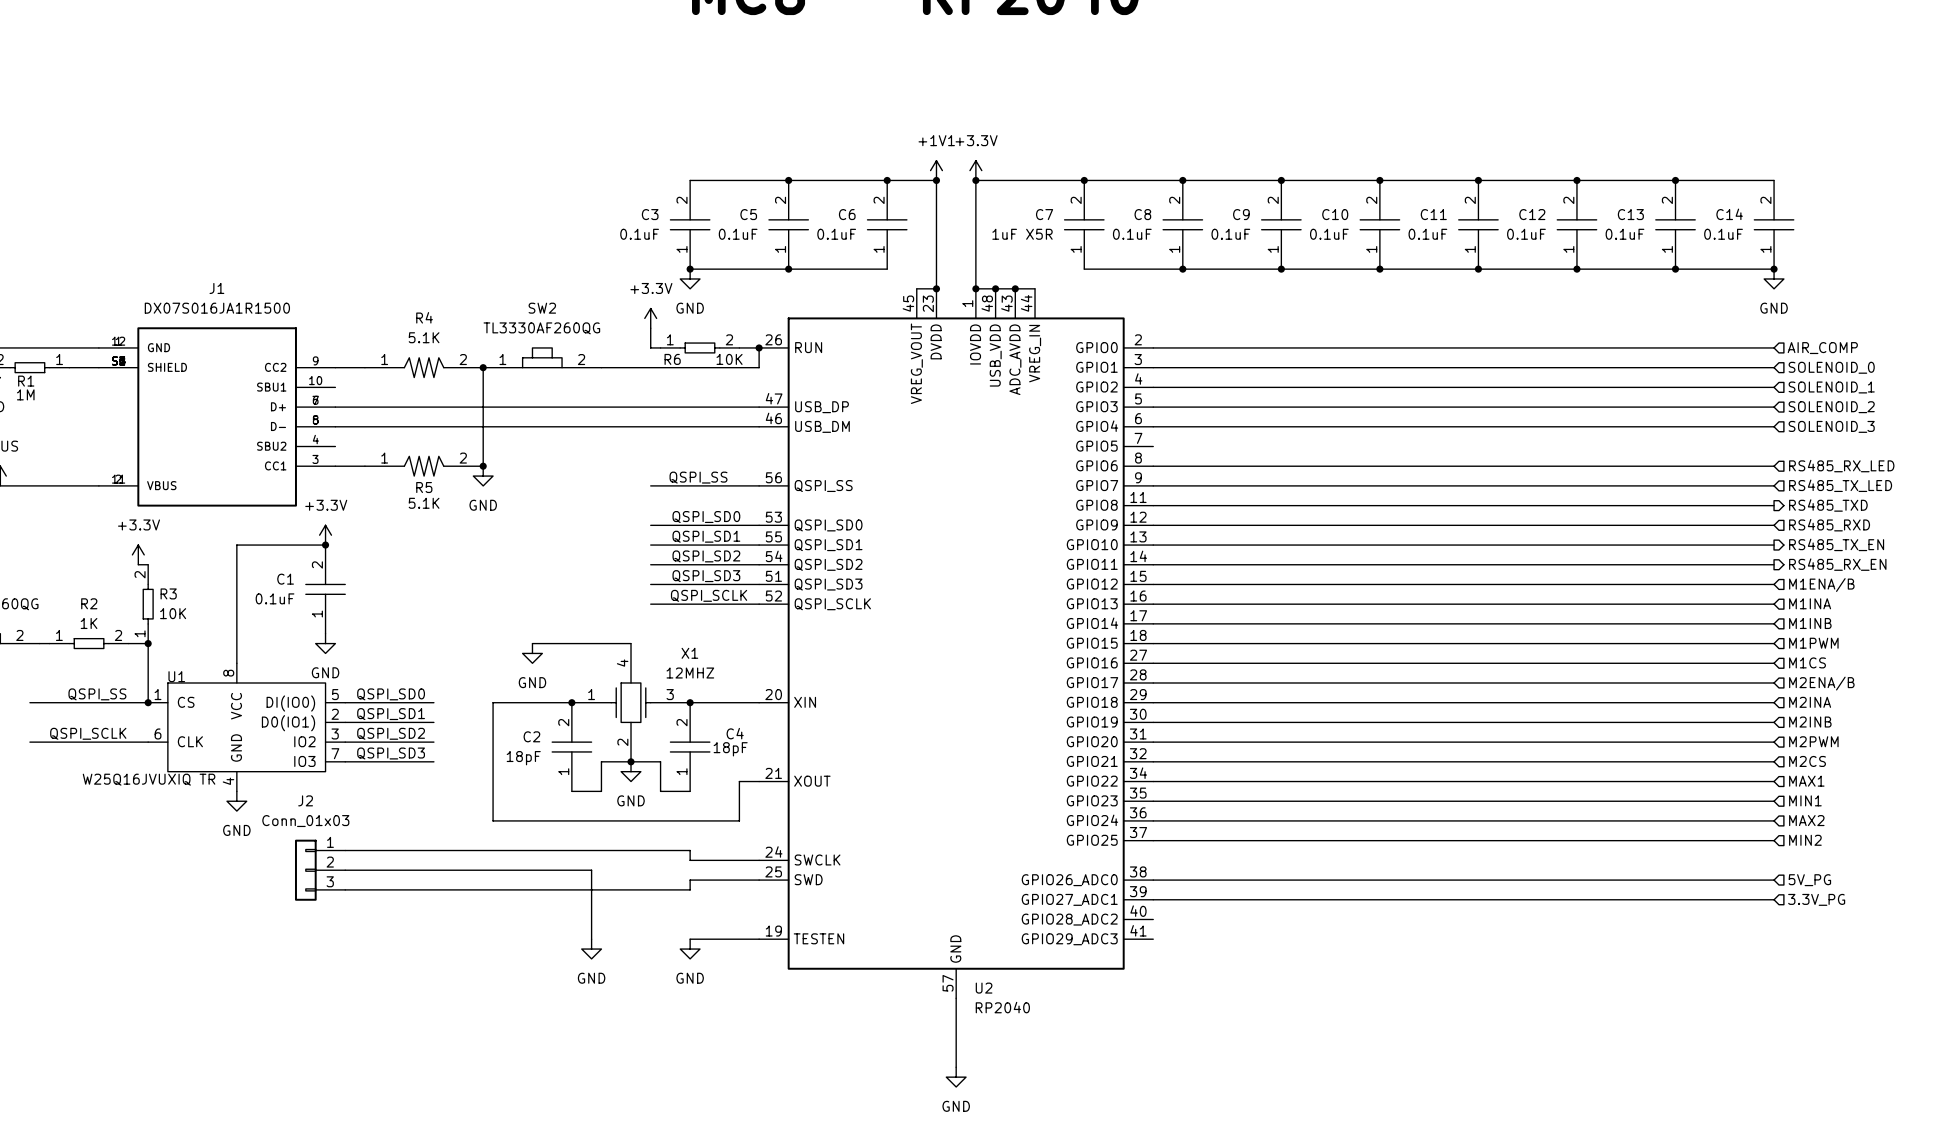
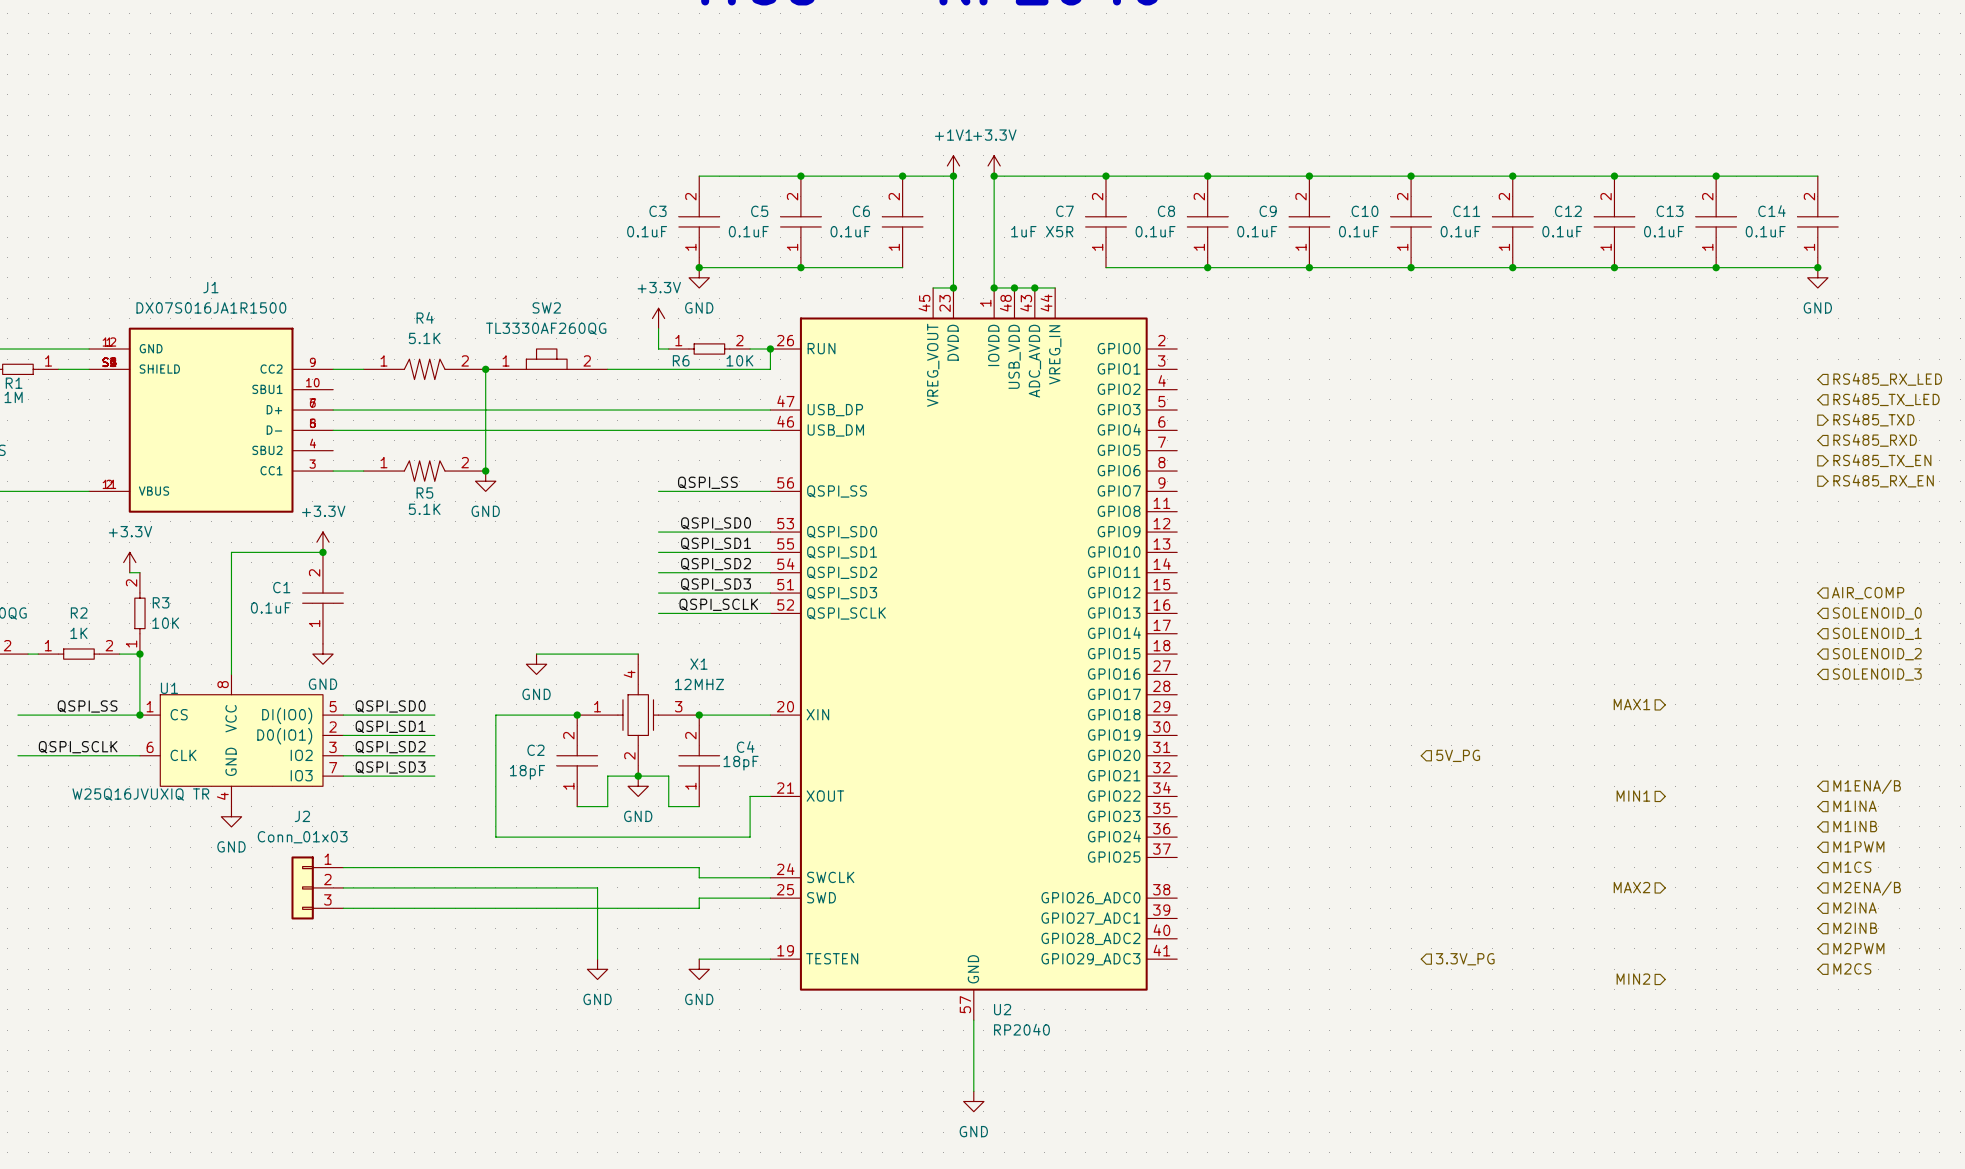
wire: (1153, 347) (1774, 347) -> none
hierarchical label: AIR_COMP (1822, 348) -> none
wire: (1153, 367) (1774, 367) -> none
hierarchical label: SOLENOID_0 (1831, 367) -> none
wire: (1153, 387) (1774, 387) -> none
hierarchical label: SOLENOID_1 (1831, 387) -> none
wire: (1153, 407) (1774, 407) -> none
hierarchical label: SOLENOID_2 (1831, 407) -> none
wire: (1153, 426) (1774, 426) -> none
hierarchical label: SOLENOID_3 (1831, 426) -> none
wire: (1153, 466) (1774, 466) -> none
hierarchical label position: RS485_RX_LED (1841, 466) -> RS485_RX_LED (1887, 379)
wire: (1153, 485) (1774, 485) -> none
hierarchical label position: RS485_TX_LED (1840, 485) -> RS485_TX_LED (1886, 399)
wire: (1153, 505) (1774, 505) -> none
hierarchical label position: RS485_TXD (1828, 505) -> RS485_TXD (1873, 420)
wire: (1153, 525) (1774, 525) -> none
hierarchical label position: RS485_RXD (1829, 525) -> RS485_RXD (1875, 440)
hierarchical label position: RS485_TX_EN (1836, 544) -> RS485_TX_EN (1882, 460)
wire: (1153, 545) (1774, 545) -> none
wire: (1153, 564) (1774, 564) -> none
hierarchical label position: RS485_RX_EN (1837, 564) -> RS485_RX_EN (1883, 481)
wire: (1153, 584) (1774, 584) -> none
hierarchical label: M1ENA/B (1821, 585) -> AIR_COMP (1868, 593)
hierarchical label: M1INA (1810, 603) -> SOLENOID_0 (1877, 613)
wire: (1153, 604) (1774, 604) -> none
wire: (1153, 623) (1774, 623) -> none
hierarchical label: M1INB (1810, 623) -> SOLENOID_1 (1877, 633)
wire: (1153, 643) (1774, 643) -> none
hierarchical label: M1PWM (1813, 643) -> SOLENOID_2 (1877, 654)
hierarchical label: M1CS (1807, 662) -> SOLENOID_3 (1877, 674)
wire: (1153, 663) (1774, 663) -> none
wire: (1153, 682) (1774, 682) -> none
hierarchical label position: M2ENA/B (1821, 683) -> M2ENA/B (1867, 888)
hierarchical label: none -> MAX1 (1631, 704)
wire: (1153, 702) (1774, 702) -> none
hierarchical label position: M2INA (1810, 702) -> M2INA (1855, 907)
wire: (1153, 722) (1774, 722) -> none
hierarchical label position: M2INB (1810, 722) -> M2INB (1855, 928)
hierarchical label position: M2PWM (1813, 741) -> M2PWM (1858, 948)
wire: (1153, 742) (1774, 742) -> none
hierarchical label: none -> 5V_PG (1458, 755)
wire: (1153, 761) (1774, 761) -> none
hierarchical label position: M2CS (1807, 761) -> M2CS (1852, 968)
hierarchical label: none -> M1ENA/B (1867, 786)
wire: (1153, 781) (1774, 781) -> none
hierarchical label: MAX1 (1806, 781) -> none
hierarchical label: none -> M1INA (1855, 806)
hierarchical label rotation: 0° (1805, 800) -> 180° (1633, 796)
hierarchical label position: MIN1 (1805, 800) -> MIN1 (1633, 796)
wire: (1153, 801) (1774, 801) -> none
hierarchical label: none -> M1INB (1855, 826)
wire: (1153, 820) (1774, 820) -> none
hierarchical label rotation: 0° (1806, 820) -> 180° (1631, 887)
hierarchical label position: MAX2 (1806, 820) -> MAX2 (1631, 887)
hierarchical label: none -> M1PWM (1858, 846)
wire: (1153, 840) (1774, 840) -> none
hierarchical label: MIN2 (1805, 840) -> none
hierarchical label: none -> M1CS (1852, 867)
wire: (1153, 880) (1774, 880) -> none
hierarchical label: 5V_PG (1809, 880) -> none
wire: (1153, 899) (1774, 899) -> none
hierarchical label: 3.3V_PG (1816, 899) -> none
hierarchical label: none -> 3.3V_PG (1465, 959)
hierarchical label: none -> MIN2 (1633, 979)

